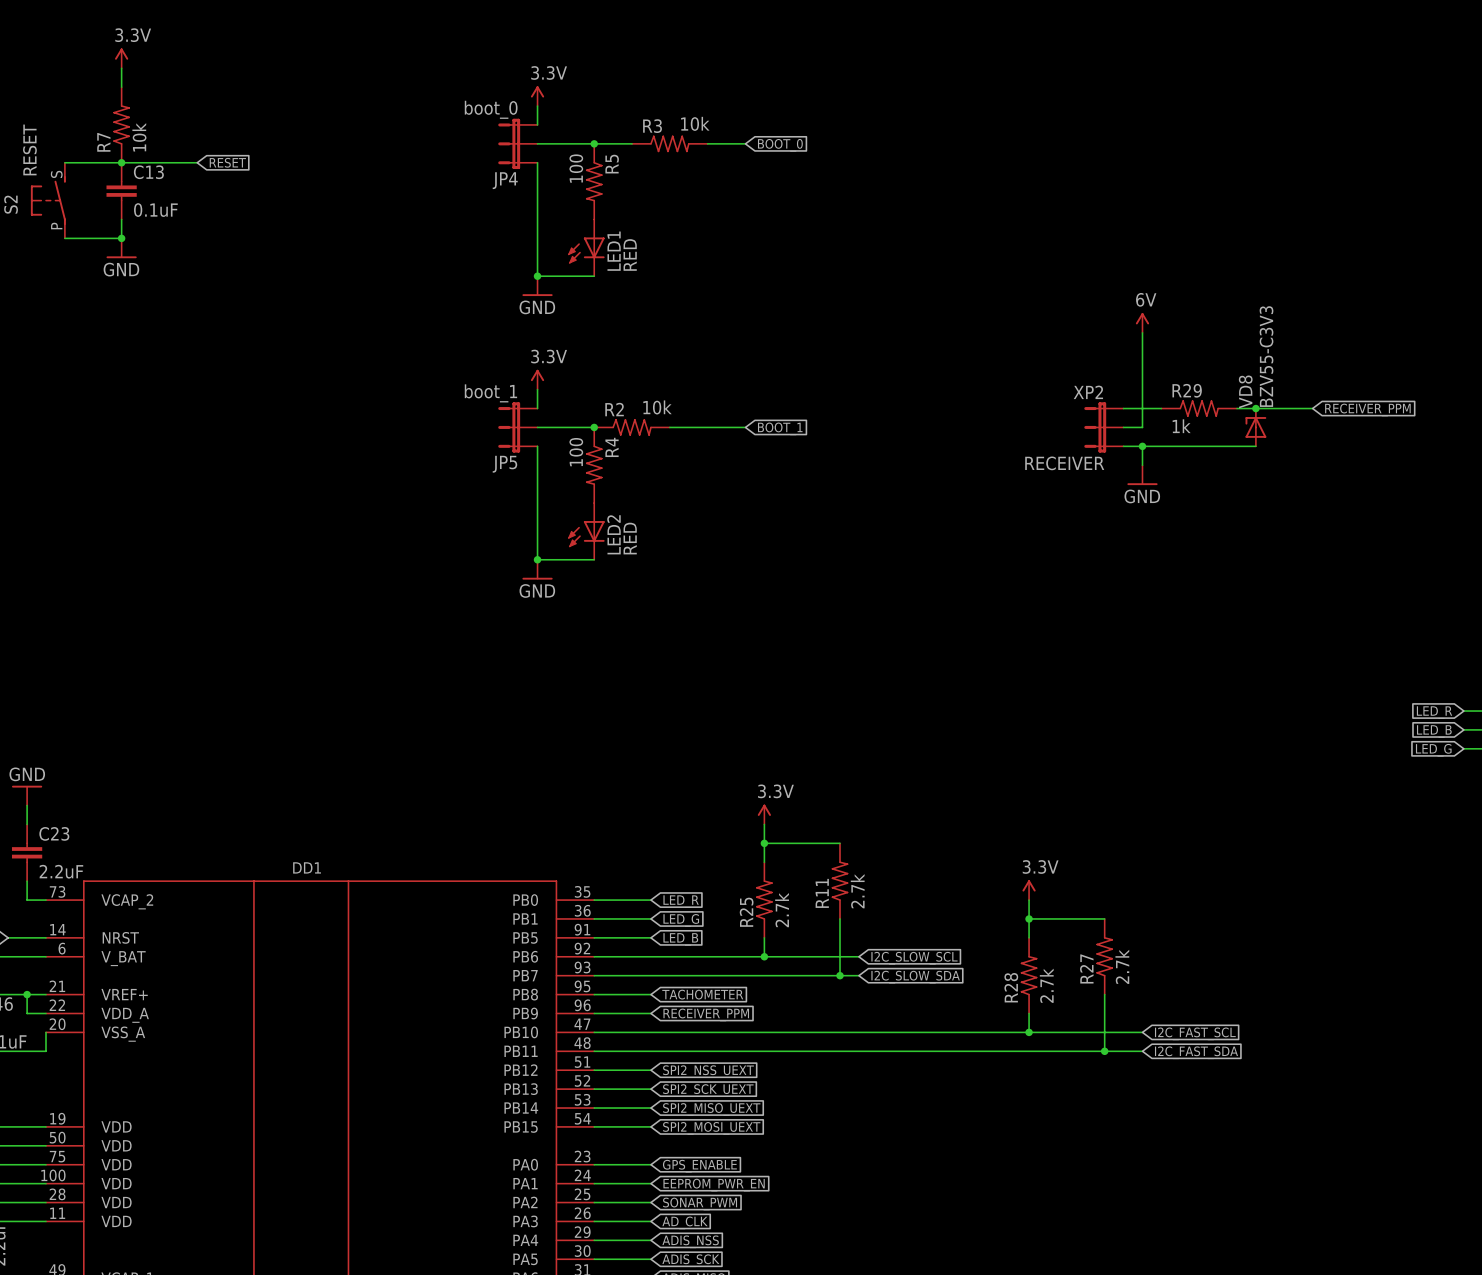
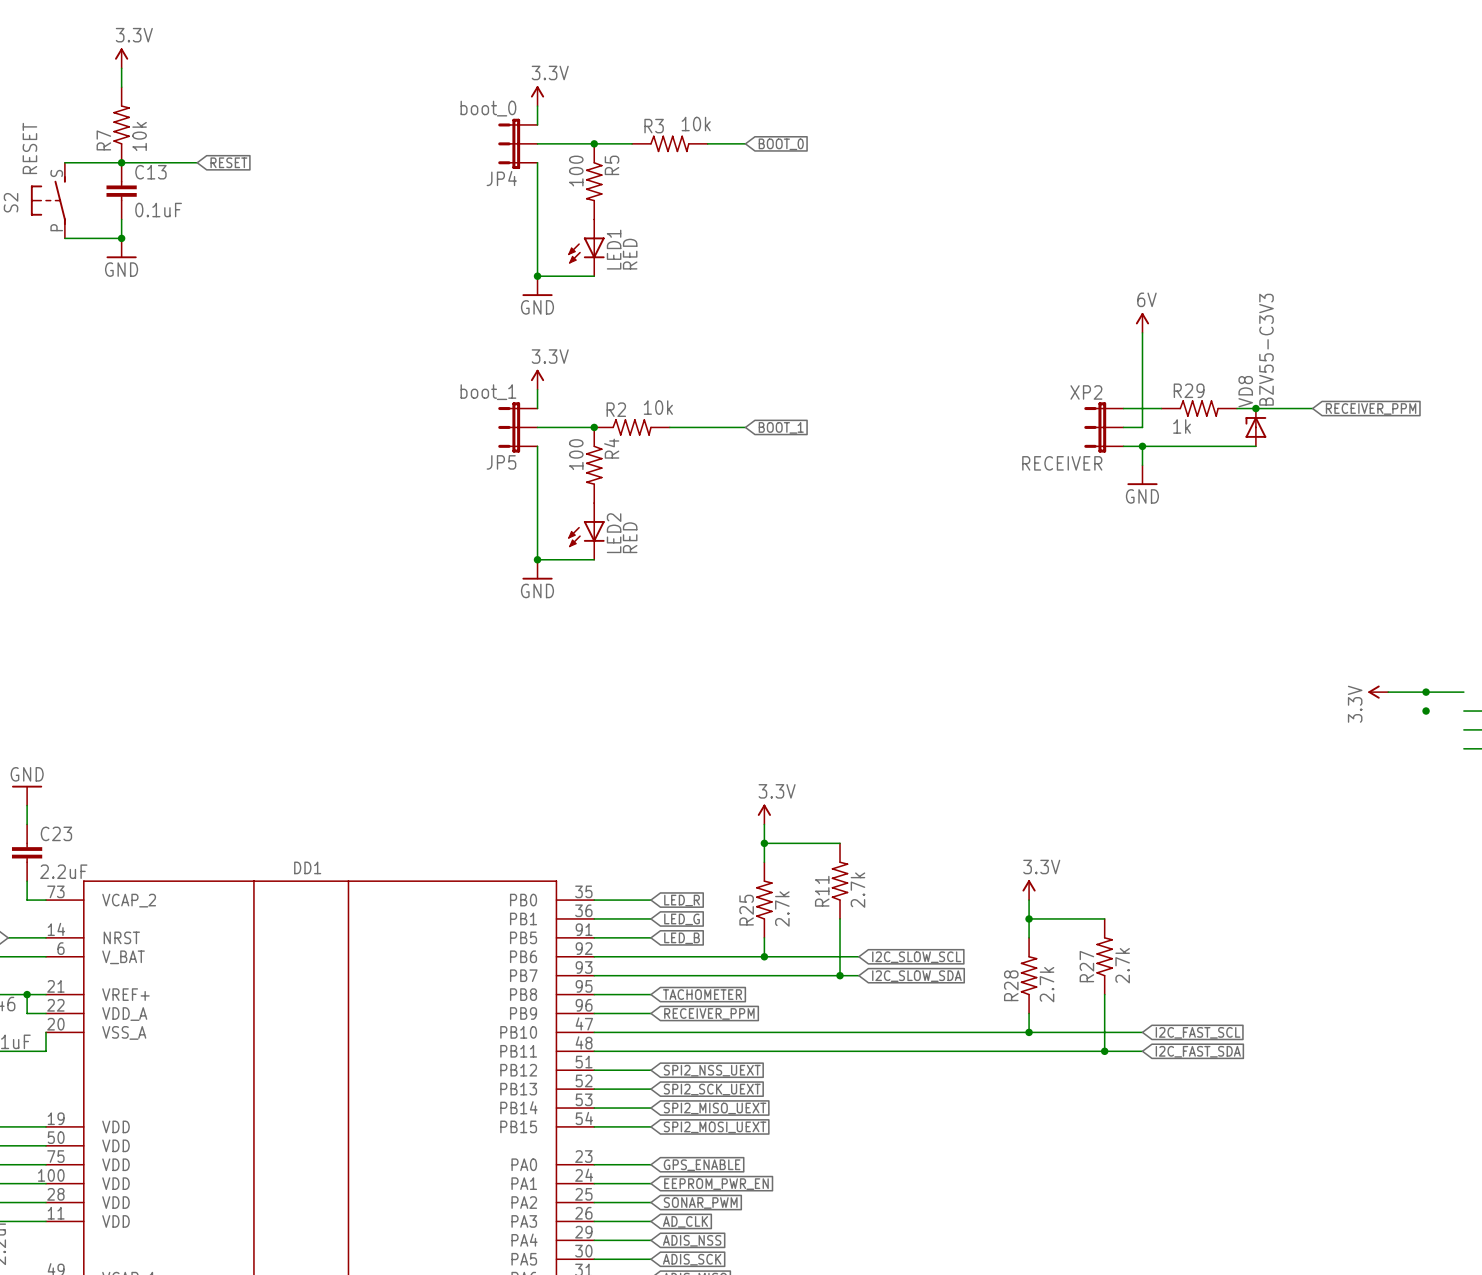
power symbol: none -> 3.3V (1378, 692)
wire: none -> (1388, 692) (1463, 692)
junction: none -> (1426, 692)
junction: none -> (1426, 711)
global label: LED_R (1434, 712) -> none
global label: LED_B (1434, 731) -> none
global label: LED_G (1433, 750) -> none

